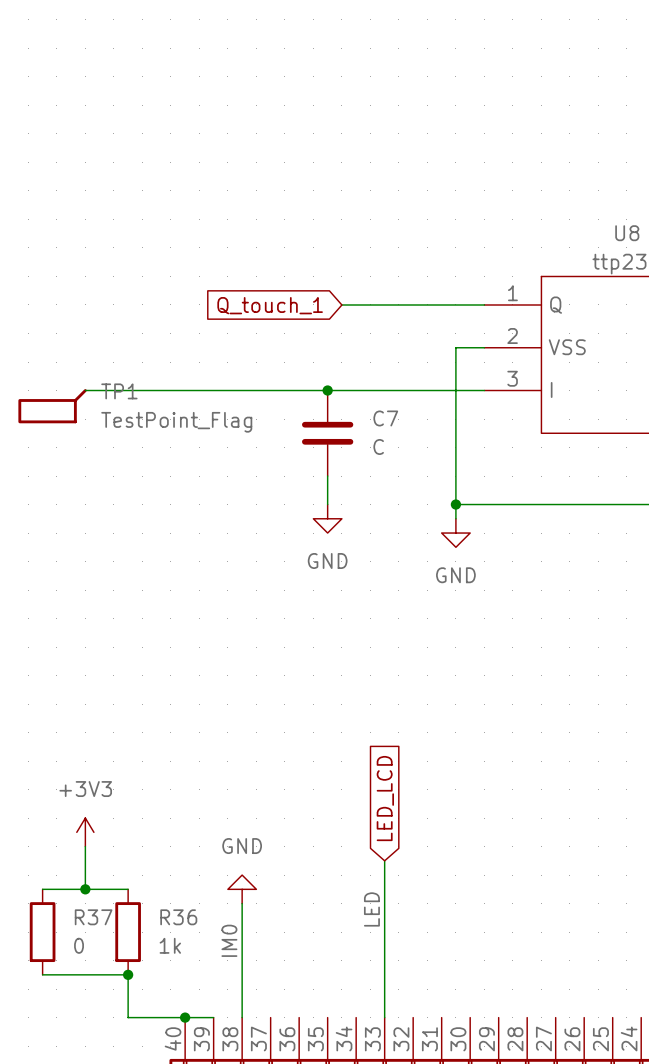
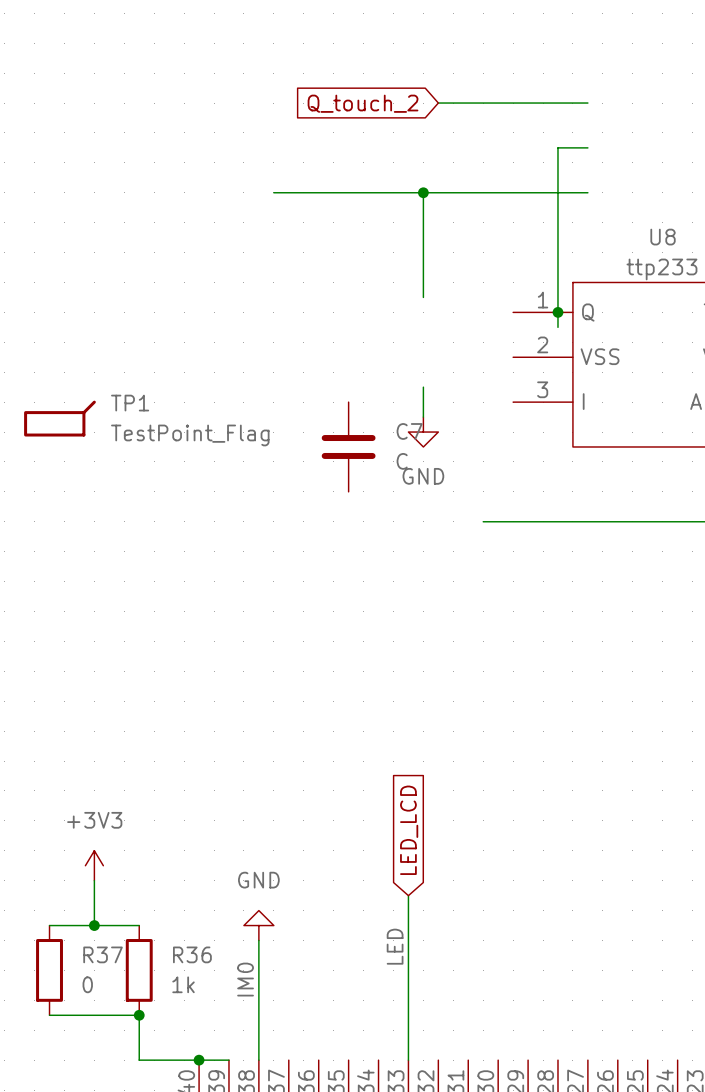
global label: none -> Q_touch_2 (363, 103)
wire: none -> (273, 192) (587, 192)
wire: none -> (423, 192) (423, 297)
junction: none -> (423, 192)
wire: (341, 304) (484, 304) -> (438, 103) (587, 103)
junction: none -> (557, 312)
global label: Q_touch_1 (270, 305) -> none
wire: (484, 347) (455, 347) (455, 518) -> (587, 147) (557, 147) (557, 327)
wire: (85, 390) (484, 390) -> none
junction: (327, 390) -> none
power symbol: none -> GND (423, 432)
wire: (327, 476) (327, 504) -> (423, 387) (423, 417)
junction: (455, 504) -> none
power symbol: GND (327, 518) -> none
power symbol: GND (455, 533) -> none

